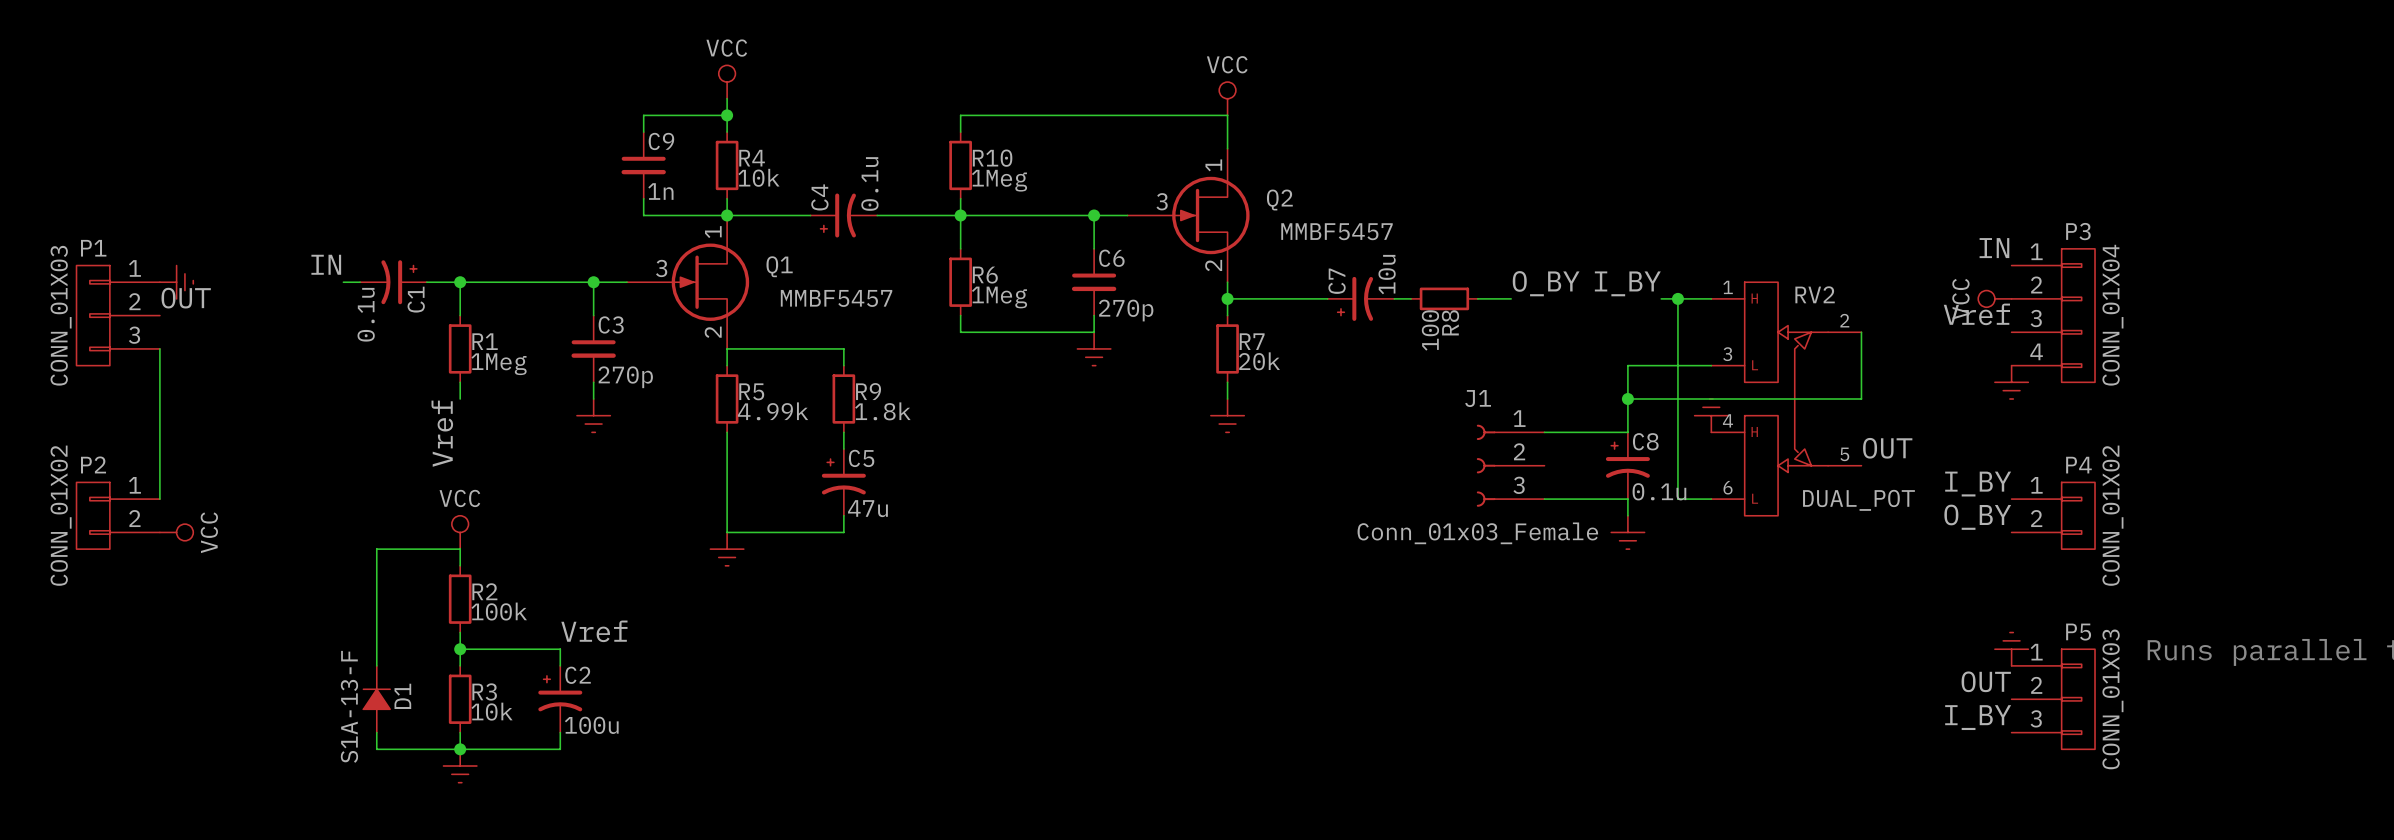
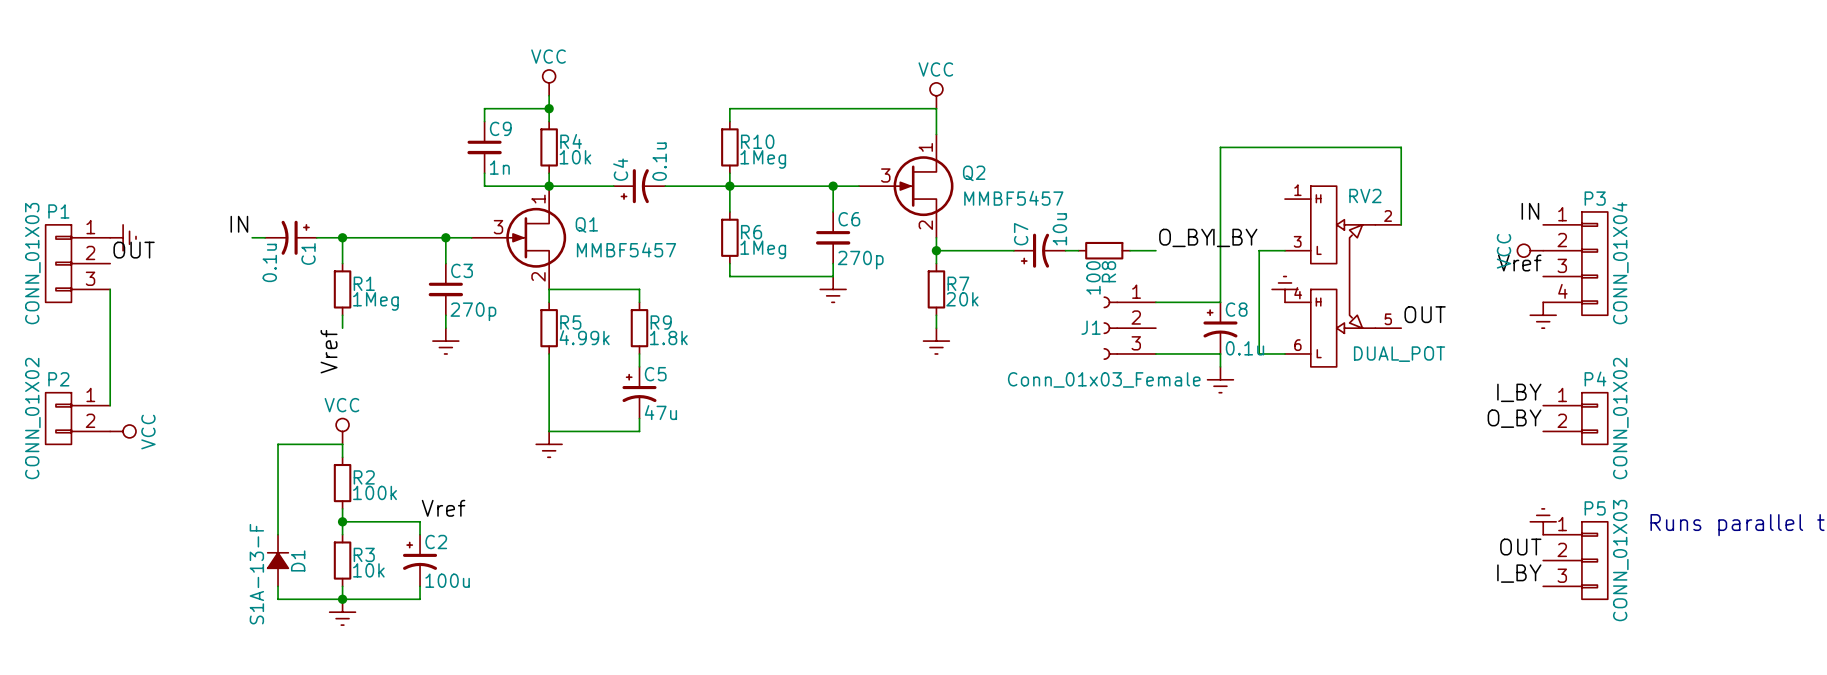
wire: none -> (1401, 224) (1401, 147) (1220, 147) (1220, 302) (1155, 302)
label position: I_BY (1627, 283) -> I_BY (1235, 237)
wire: none -> (1272, 250) (1259, 250) (1259, 353) (1285, 353)
junction: (1677, 298) -> none
wire: (1711, 298) (1677, 298) (1677, 499) (1711, 499) -> none
wire: (1861, 332) (1861, 399) (1627, 399) -> none
power symbol: none -> (1285, 289)
wire: (1711, 365) (1627, 365) (1627, 432) (1594, 432) -> (1220, 366) (1220, 353)
J1 name position: J1 (1478, 398) -> J1 (1091, 327)
junction: (1627, 399) -> none
RV2 position: (1786, 399) -> (1343, 276)
power symbol: (1711, 415) -> none
label position: OUT (1887, 448) -> OUT (1425, 314)
J1 position: (1510, 465) -> (1129, 328)
power symbol: none -> (1220, 379)
C8 position: (1627, 465) -> (1220, 328)
wire: (1544, 499) (1627, 499) (1627, 515) -> none
power symbol: (1627, 532) -> none

